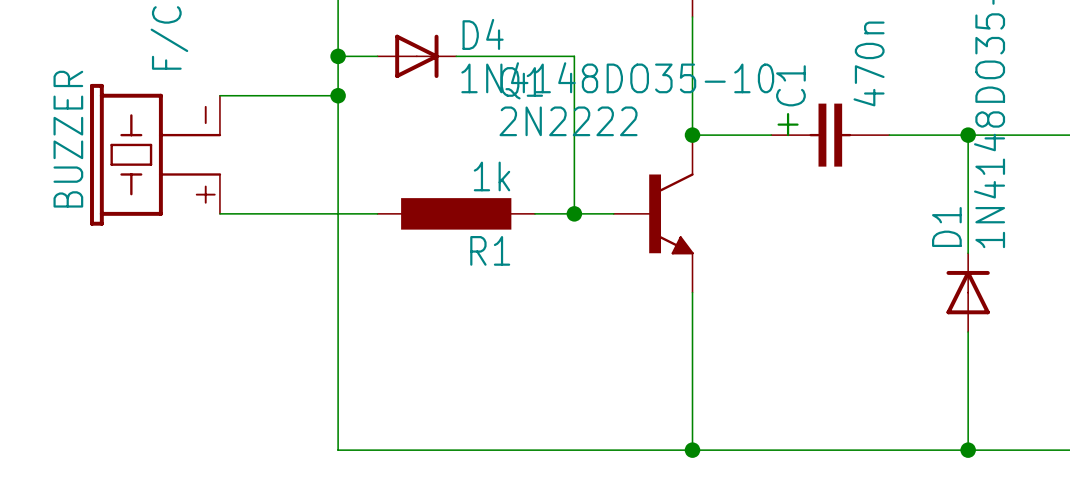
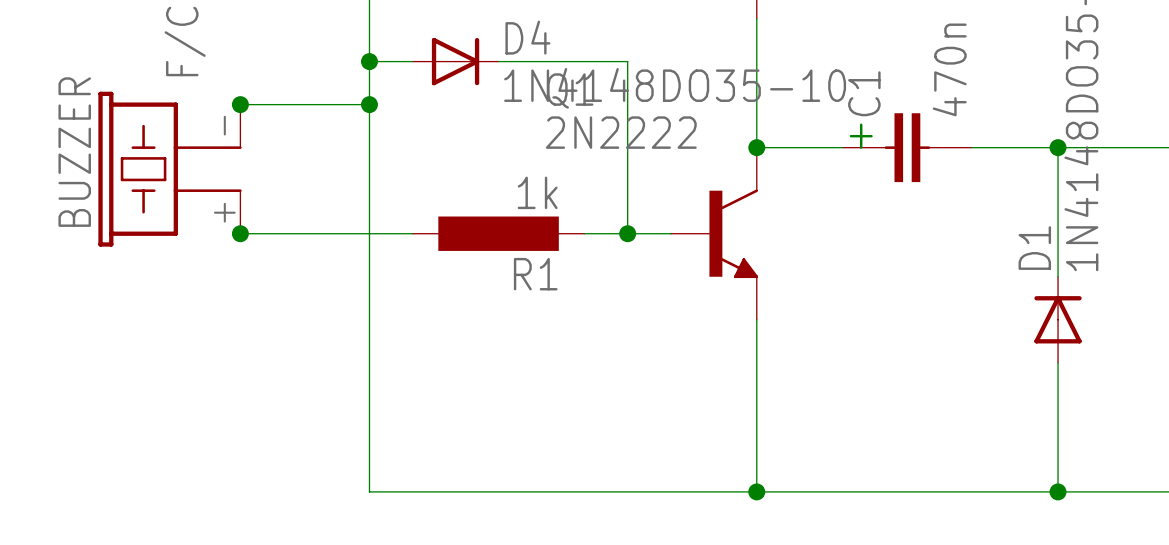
junction: none -> (240, 104)
junction: none -> (240, 233)

